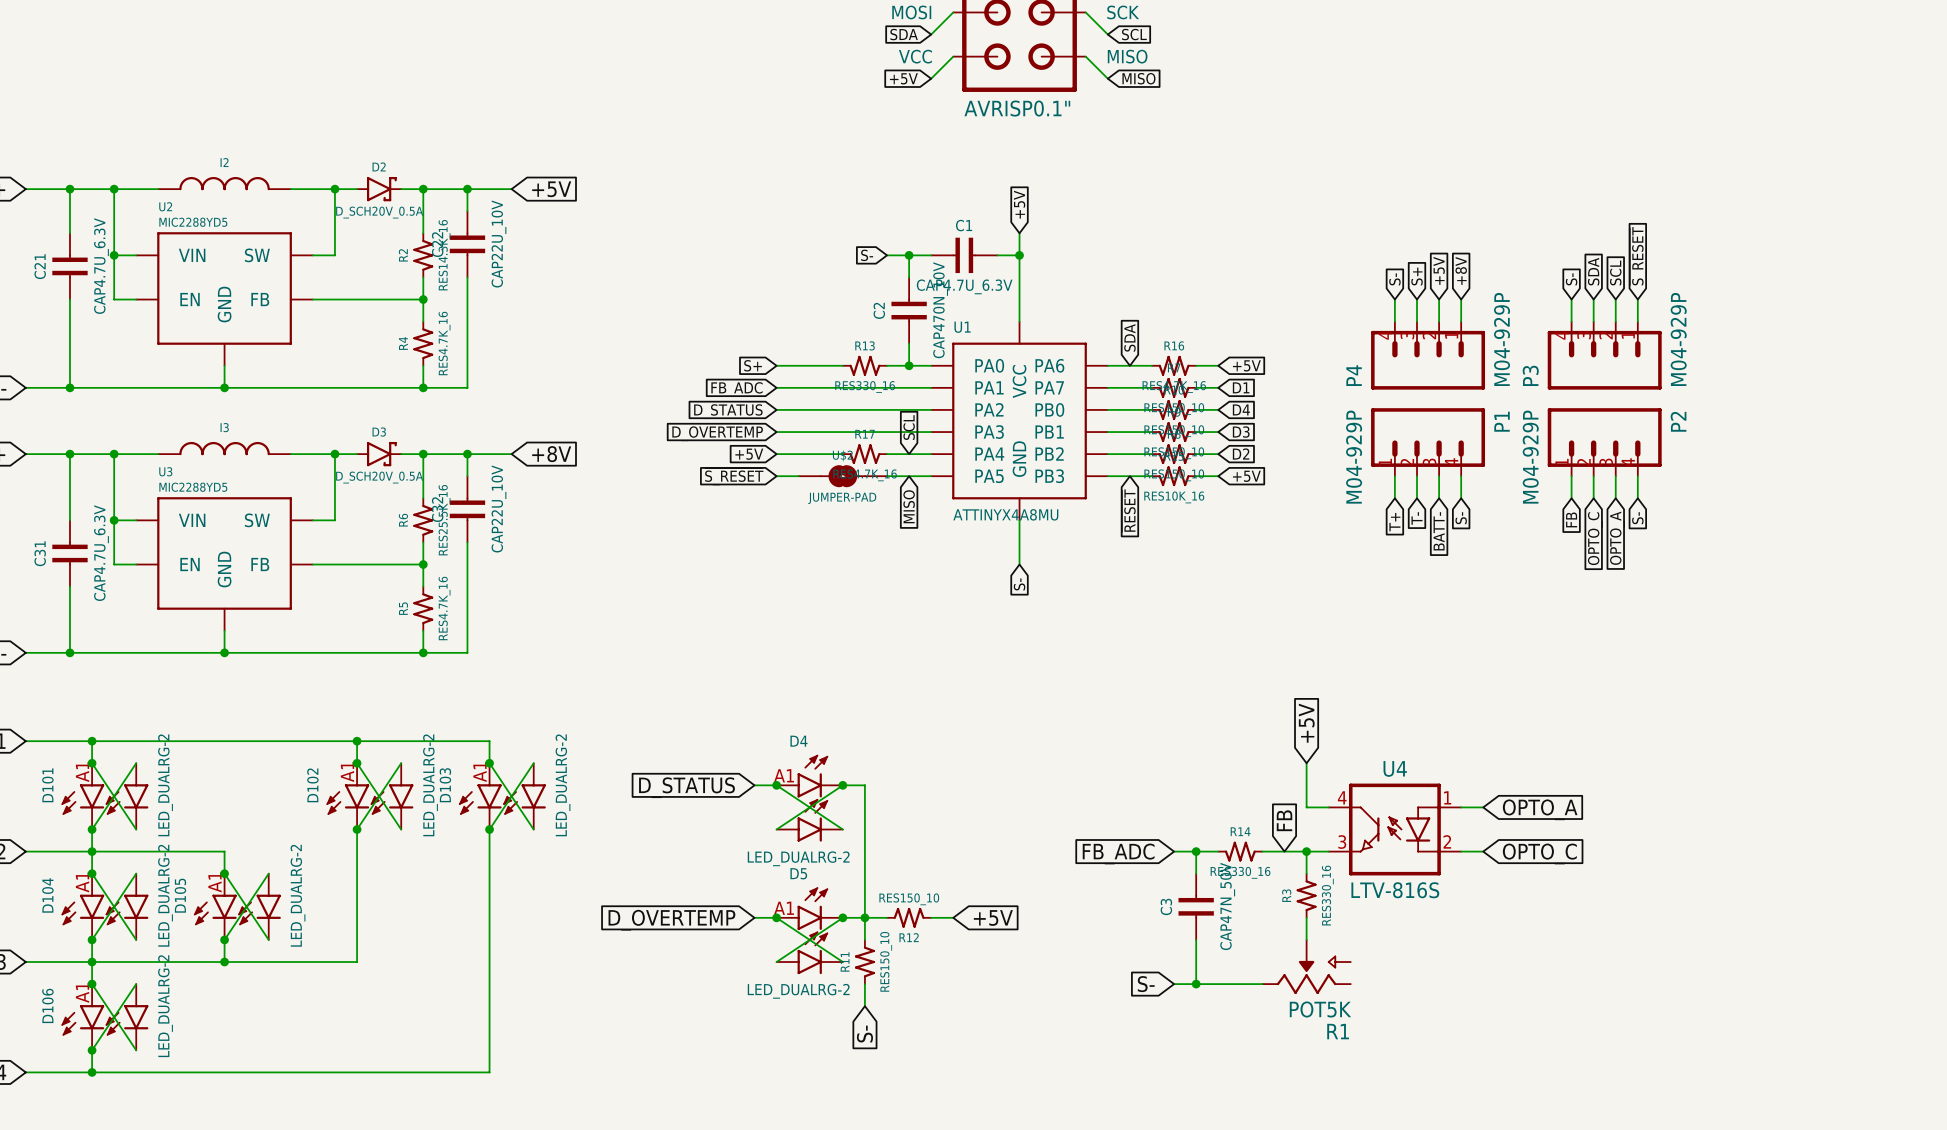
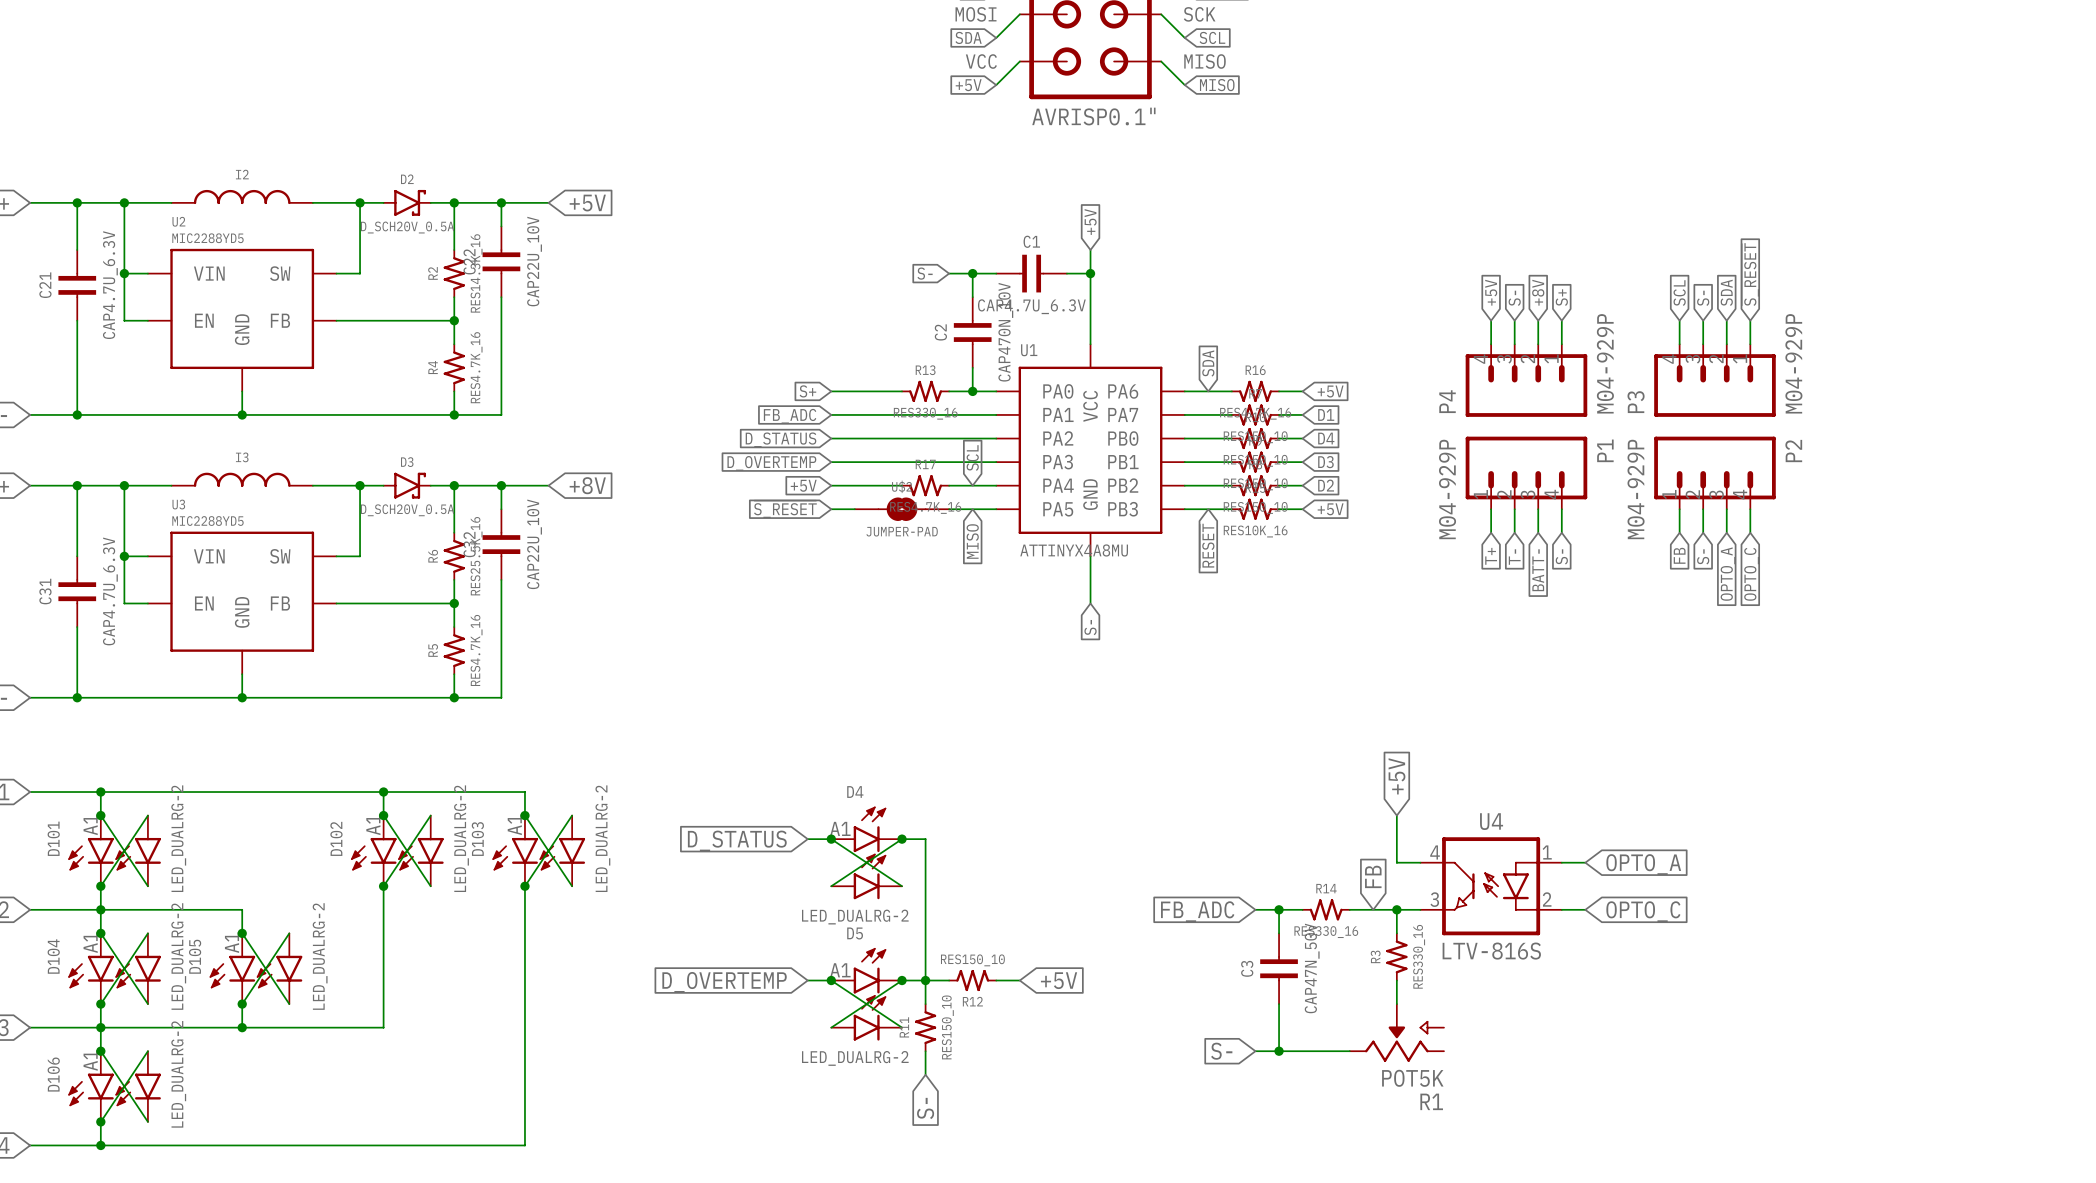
global label: +5V (1439, 270) -> +8V (1538, 292)
global label: +8V (1461, 270) -> S+ (1561, 297)
global label: SDA (1593, 271) -> S- (1703, 298)
global label: SCL (1615, 272) -> SDA (1726, 292)
global label: S+ (1417, 276) -> S- (1514, 298)
global label: S- (1394, 279) -> +5V (1491, 292)
global label: S- (1571, 279) -> SCL (1679, 293)
global label: S- (1637, 518) -> OPTO_C (1751, 574)
global label: OPTO_C (1595, 538) -> S- (1703, 556)

